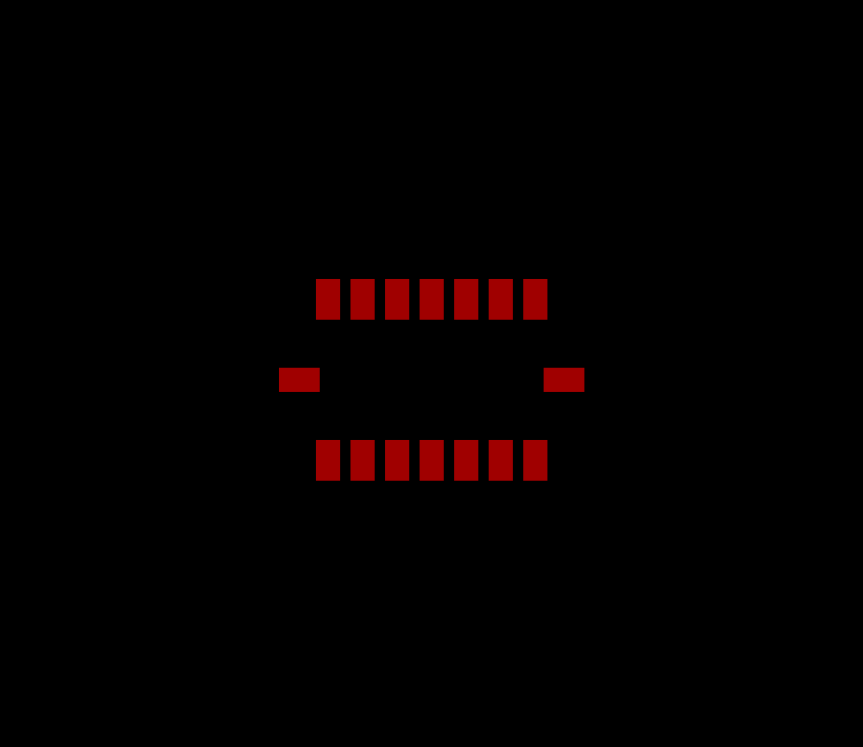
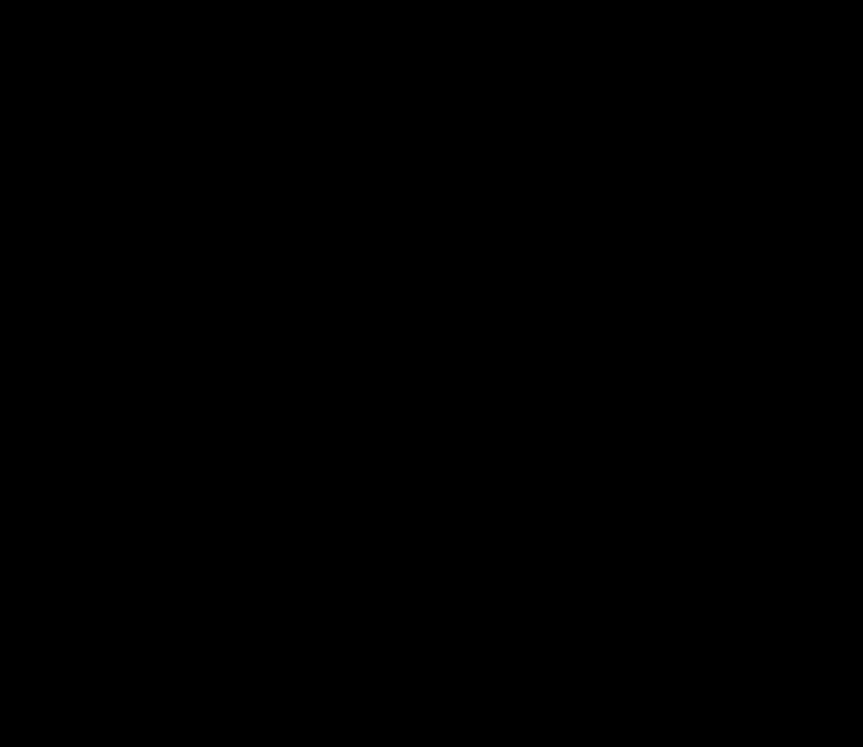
part: (431, 379) -> none

